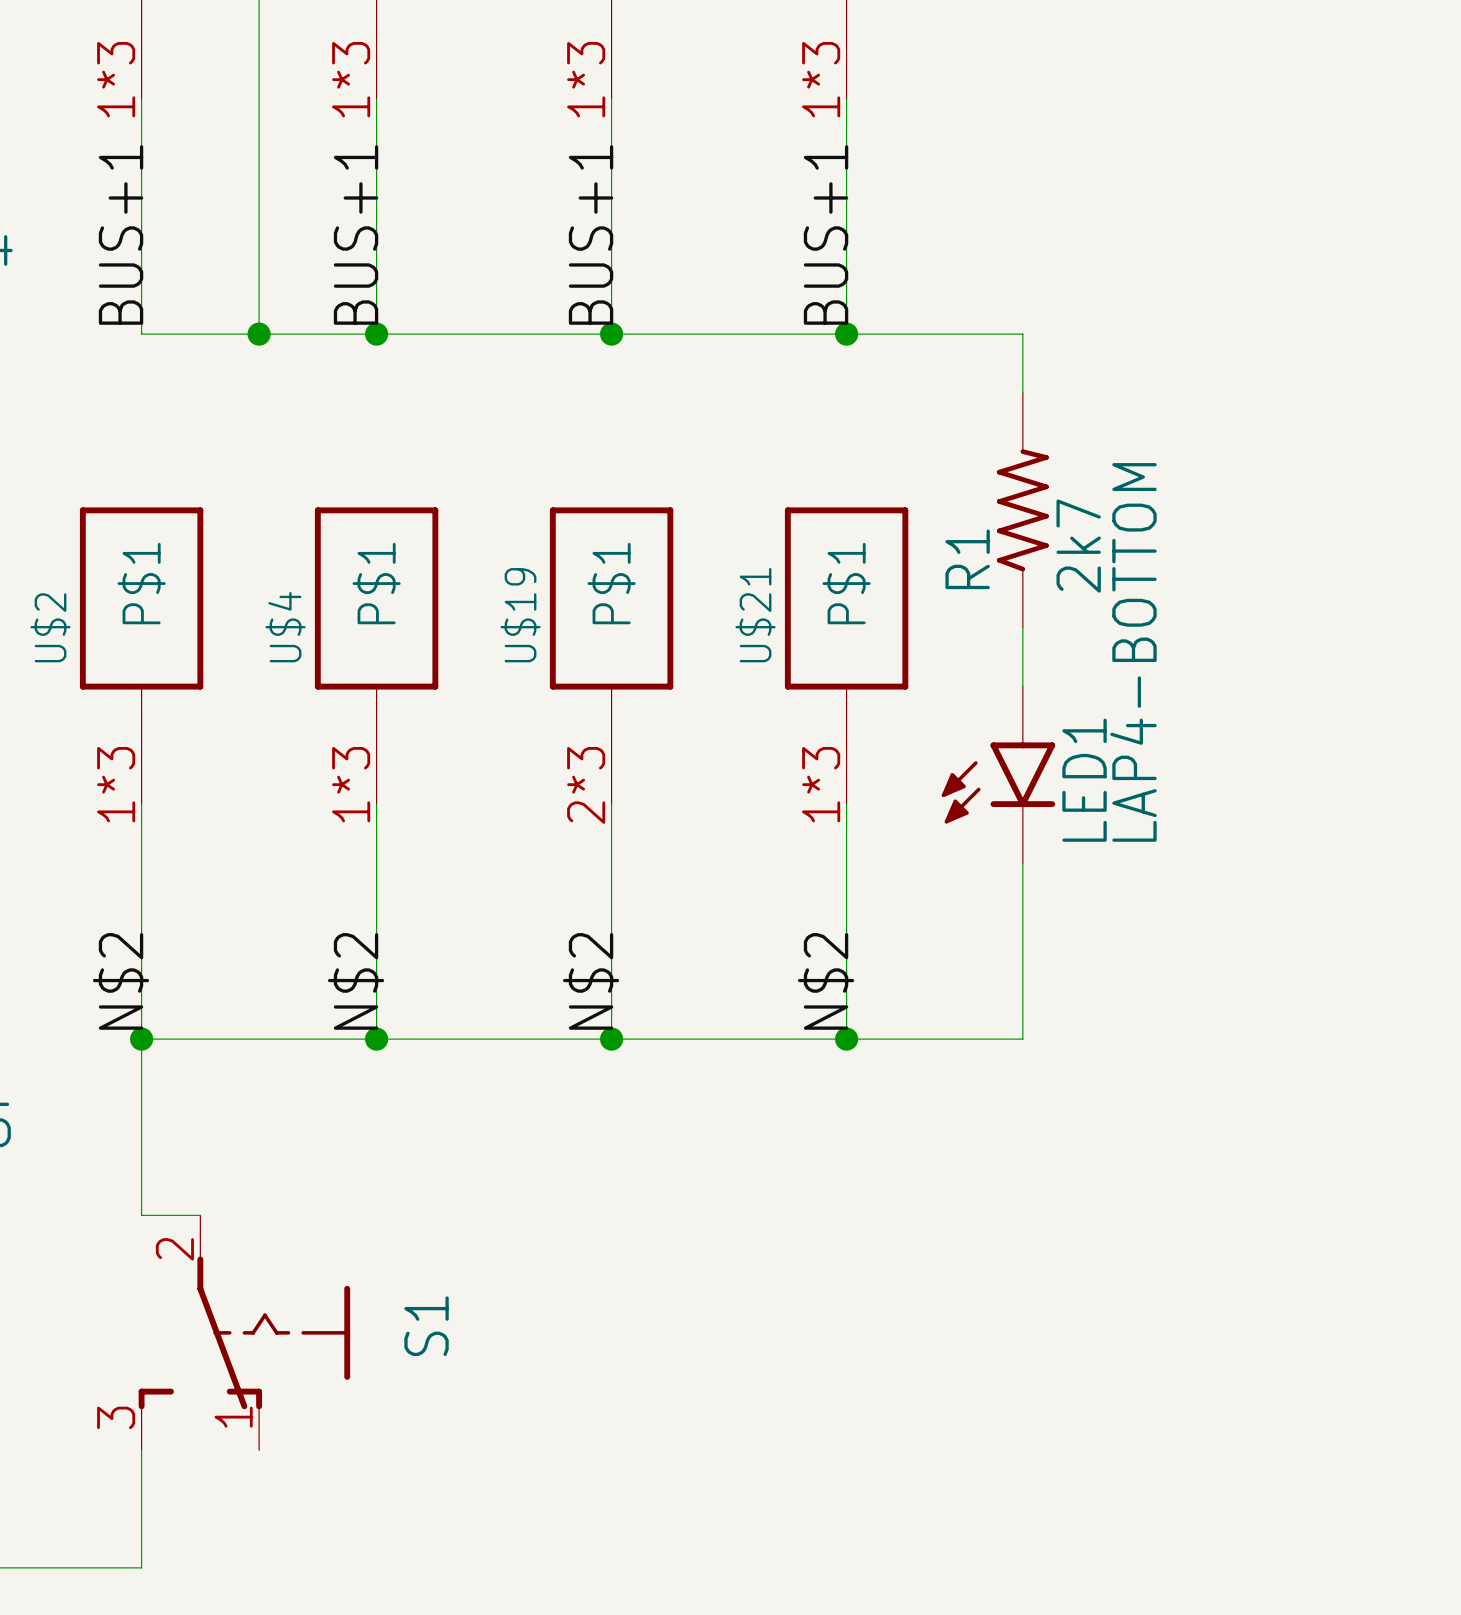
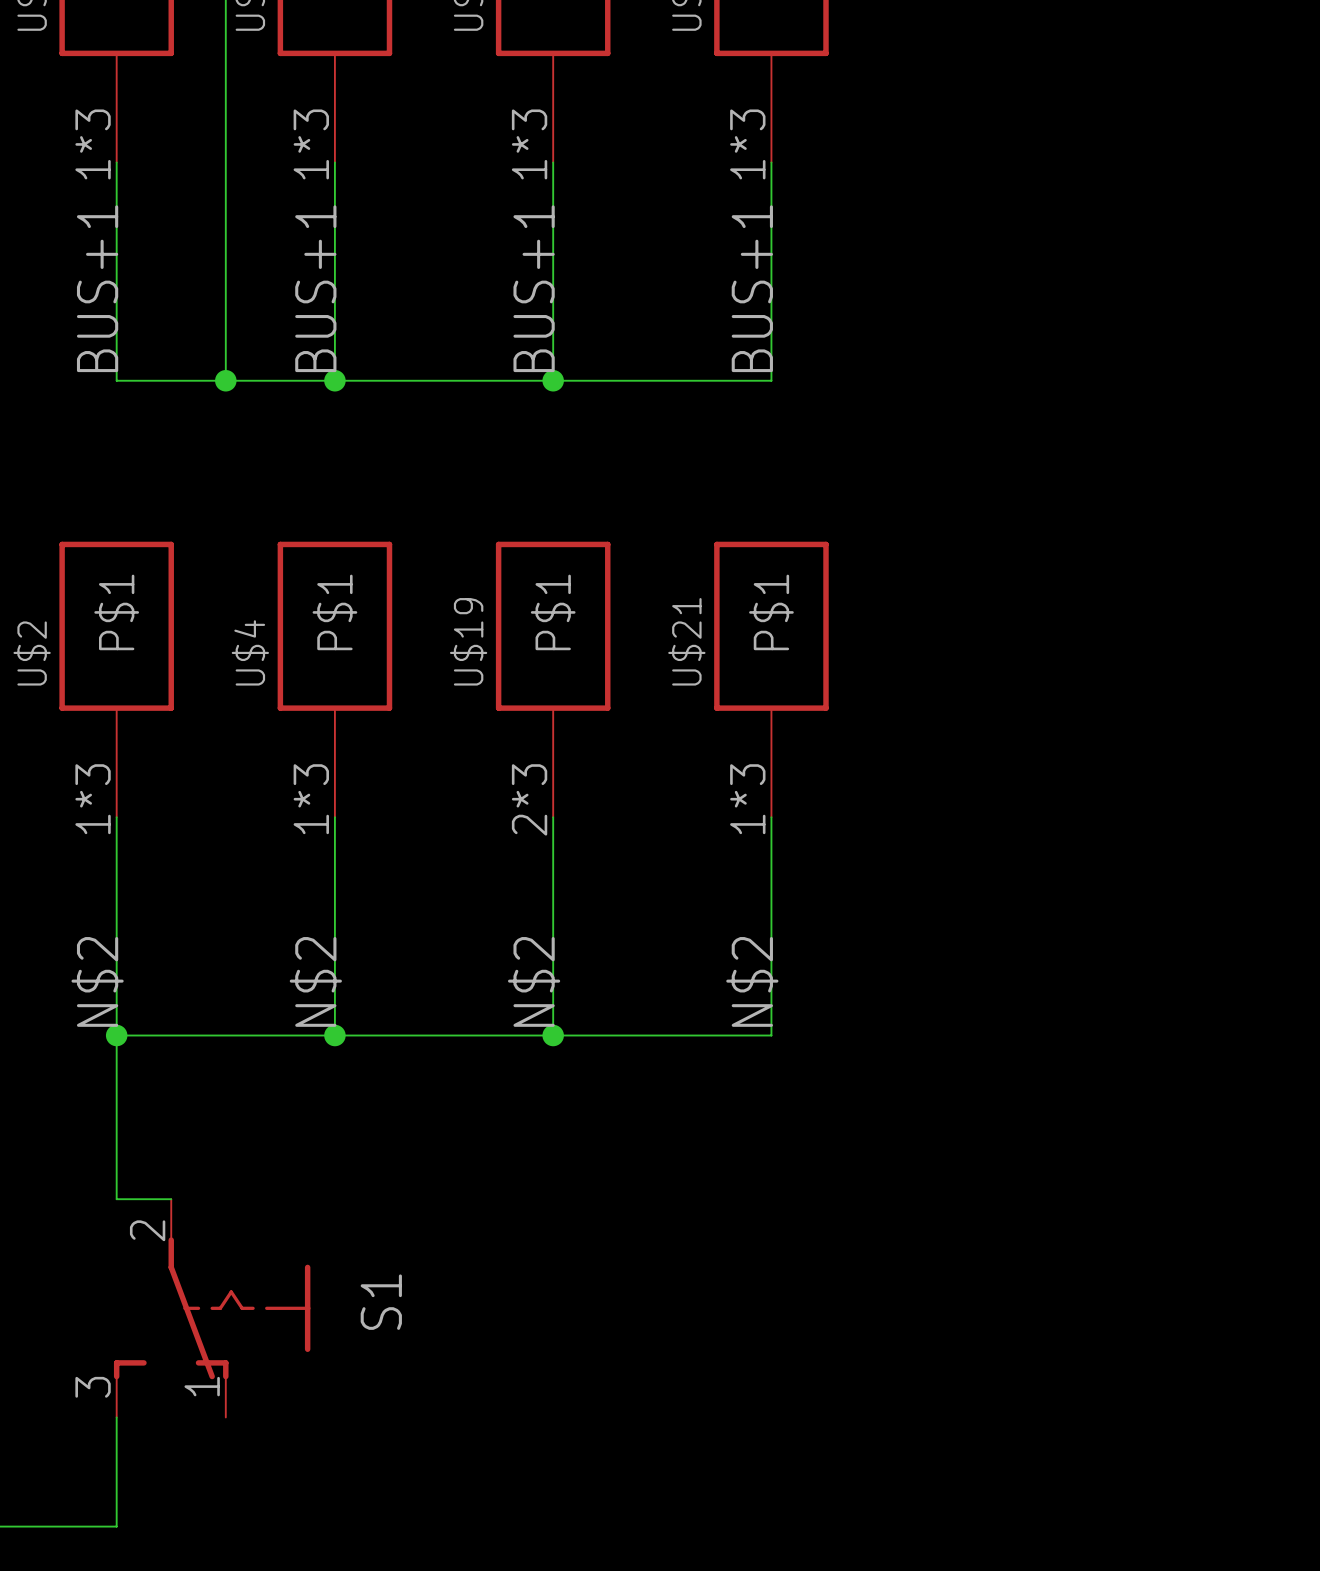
wire: (846, 334) (1022, 334) (1022, 392) -> none
junction: (846, 334) -> none
R1: 2k7 (1022, 510) -> none
wire: (1022, 627) (1022, 686) -> none
LED1: LAP4-BOTTOM (998, 774) -> none
wire: (1022, 862) (1022, 1039) (846, 1039) -> none
junction: (846, 1039) -> none

